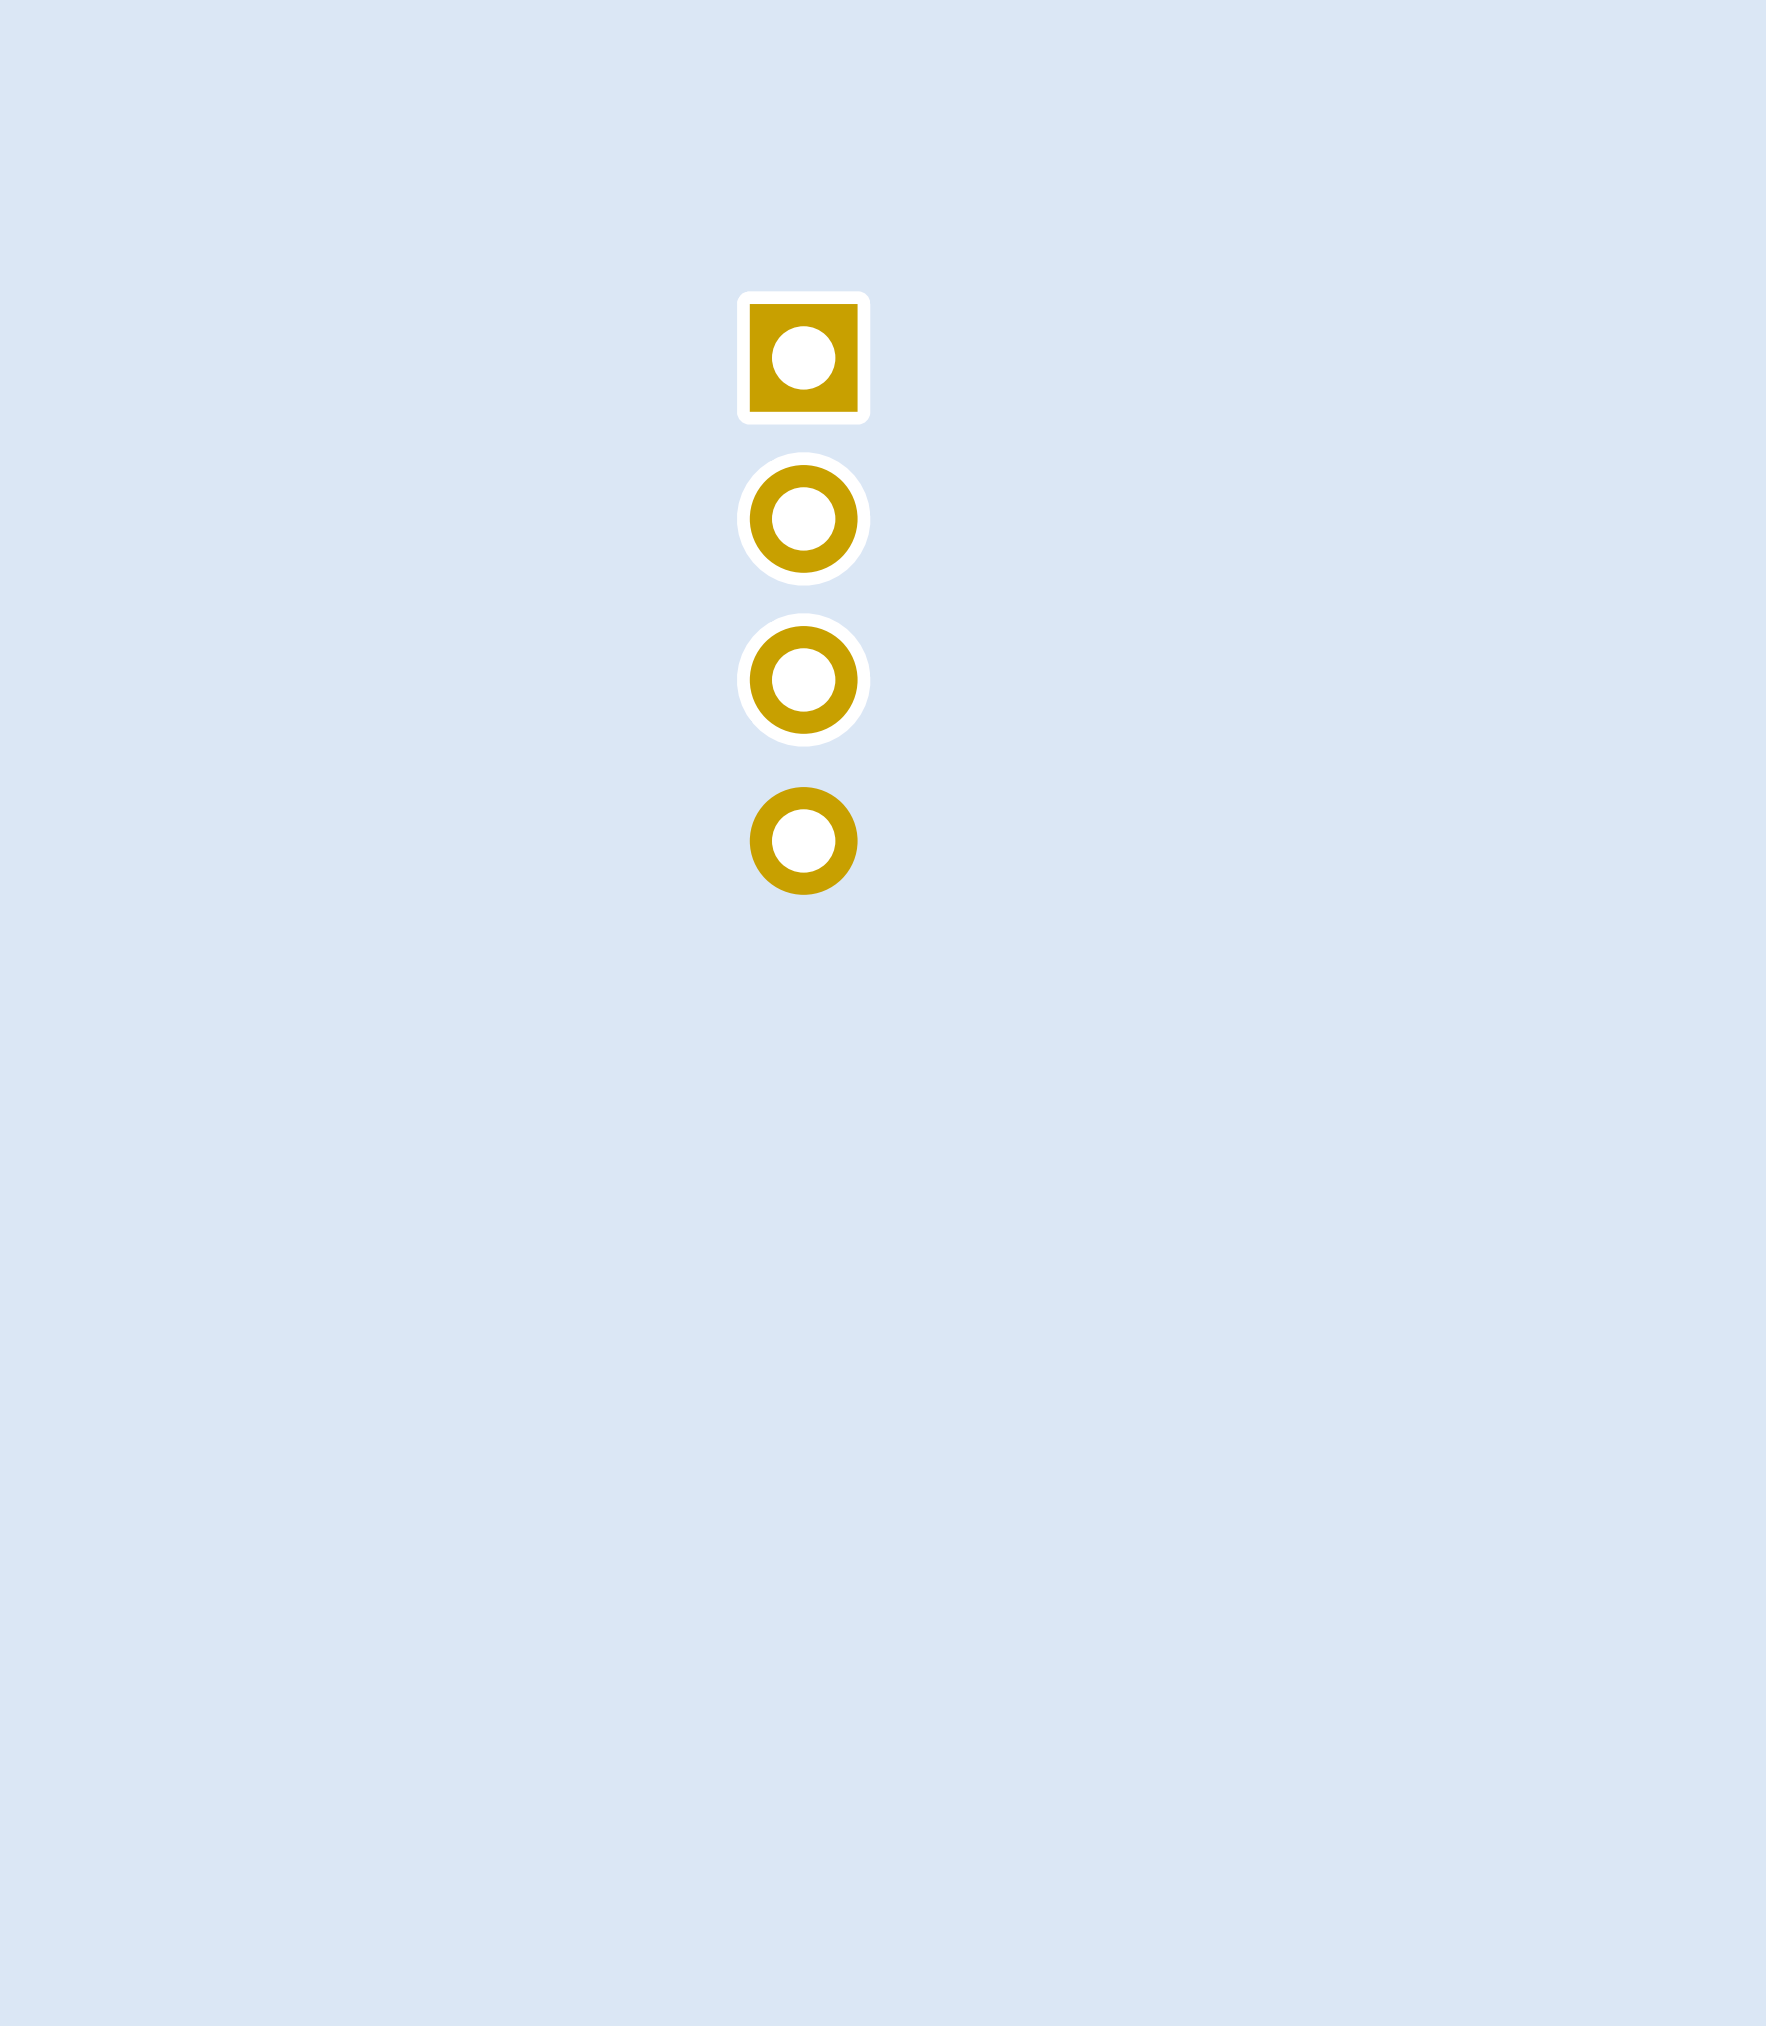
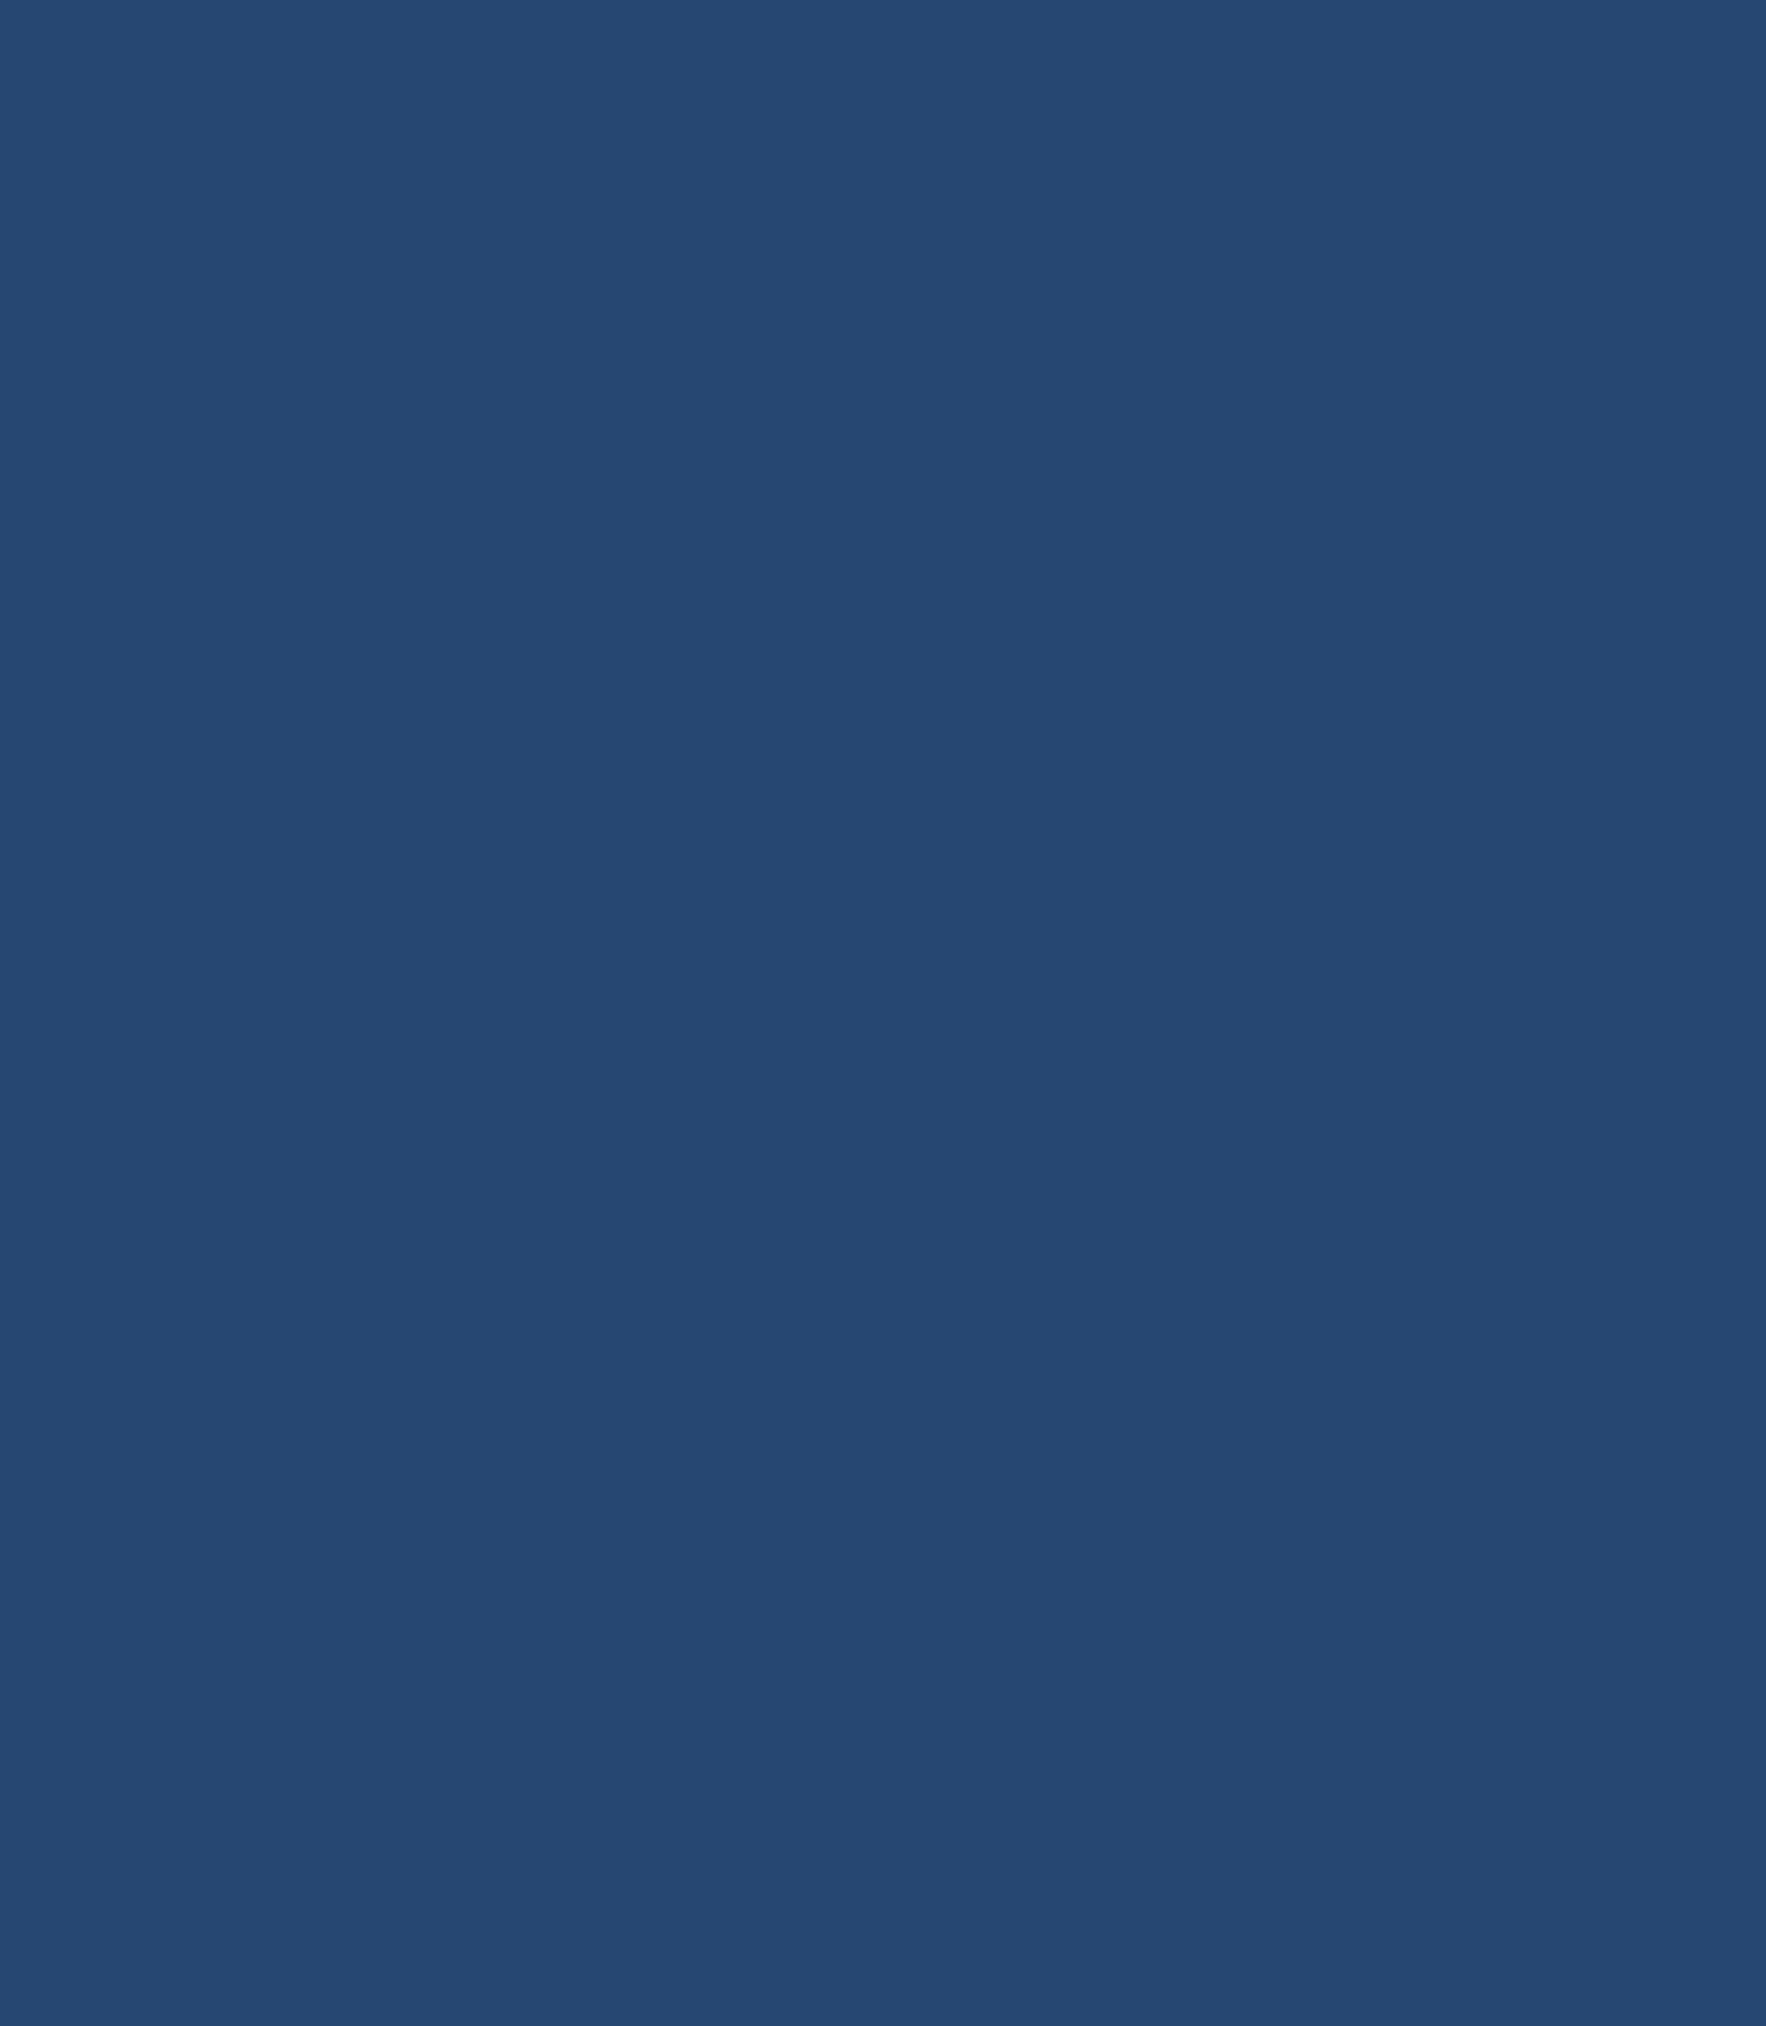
part: (803, 599) -> none

